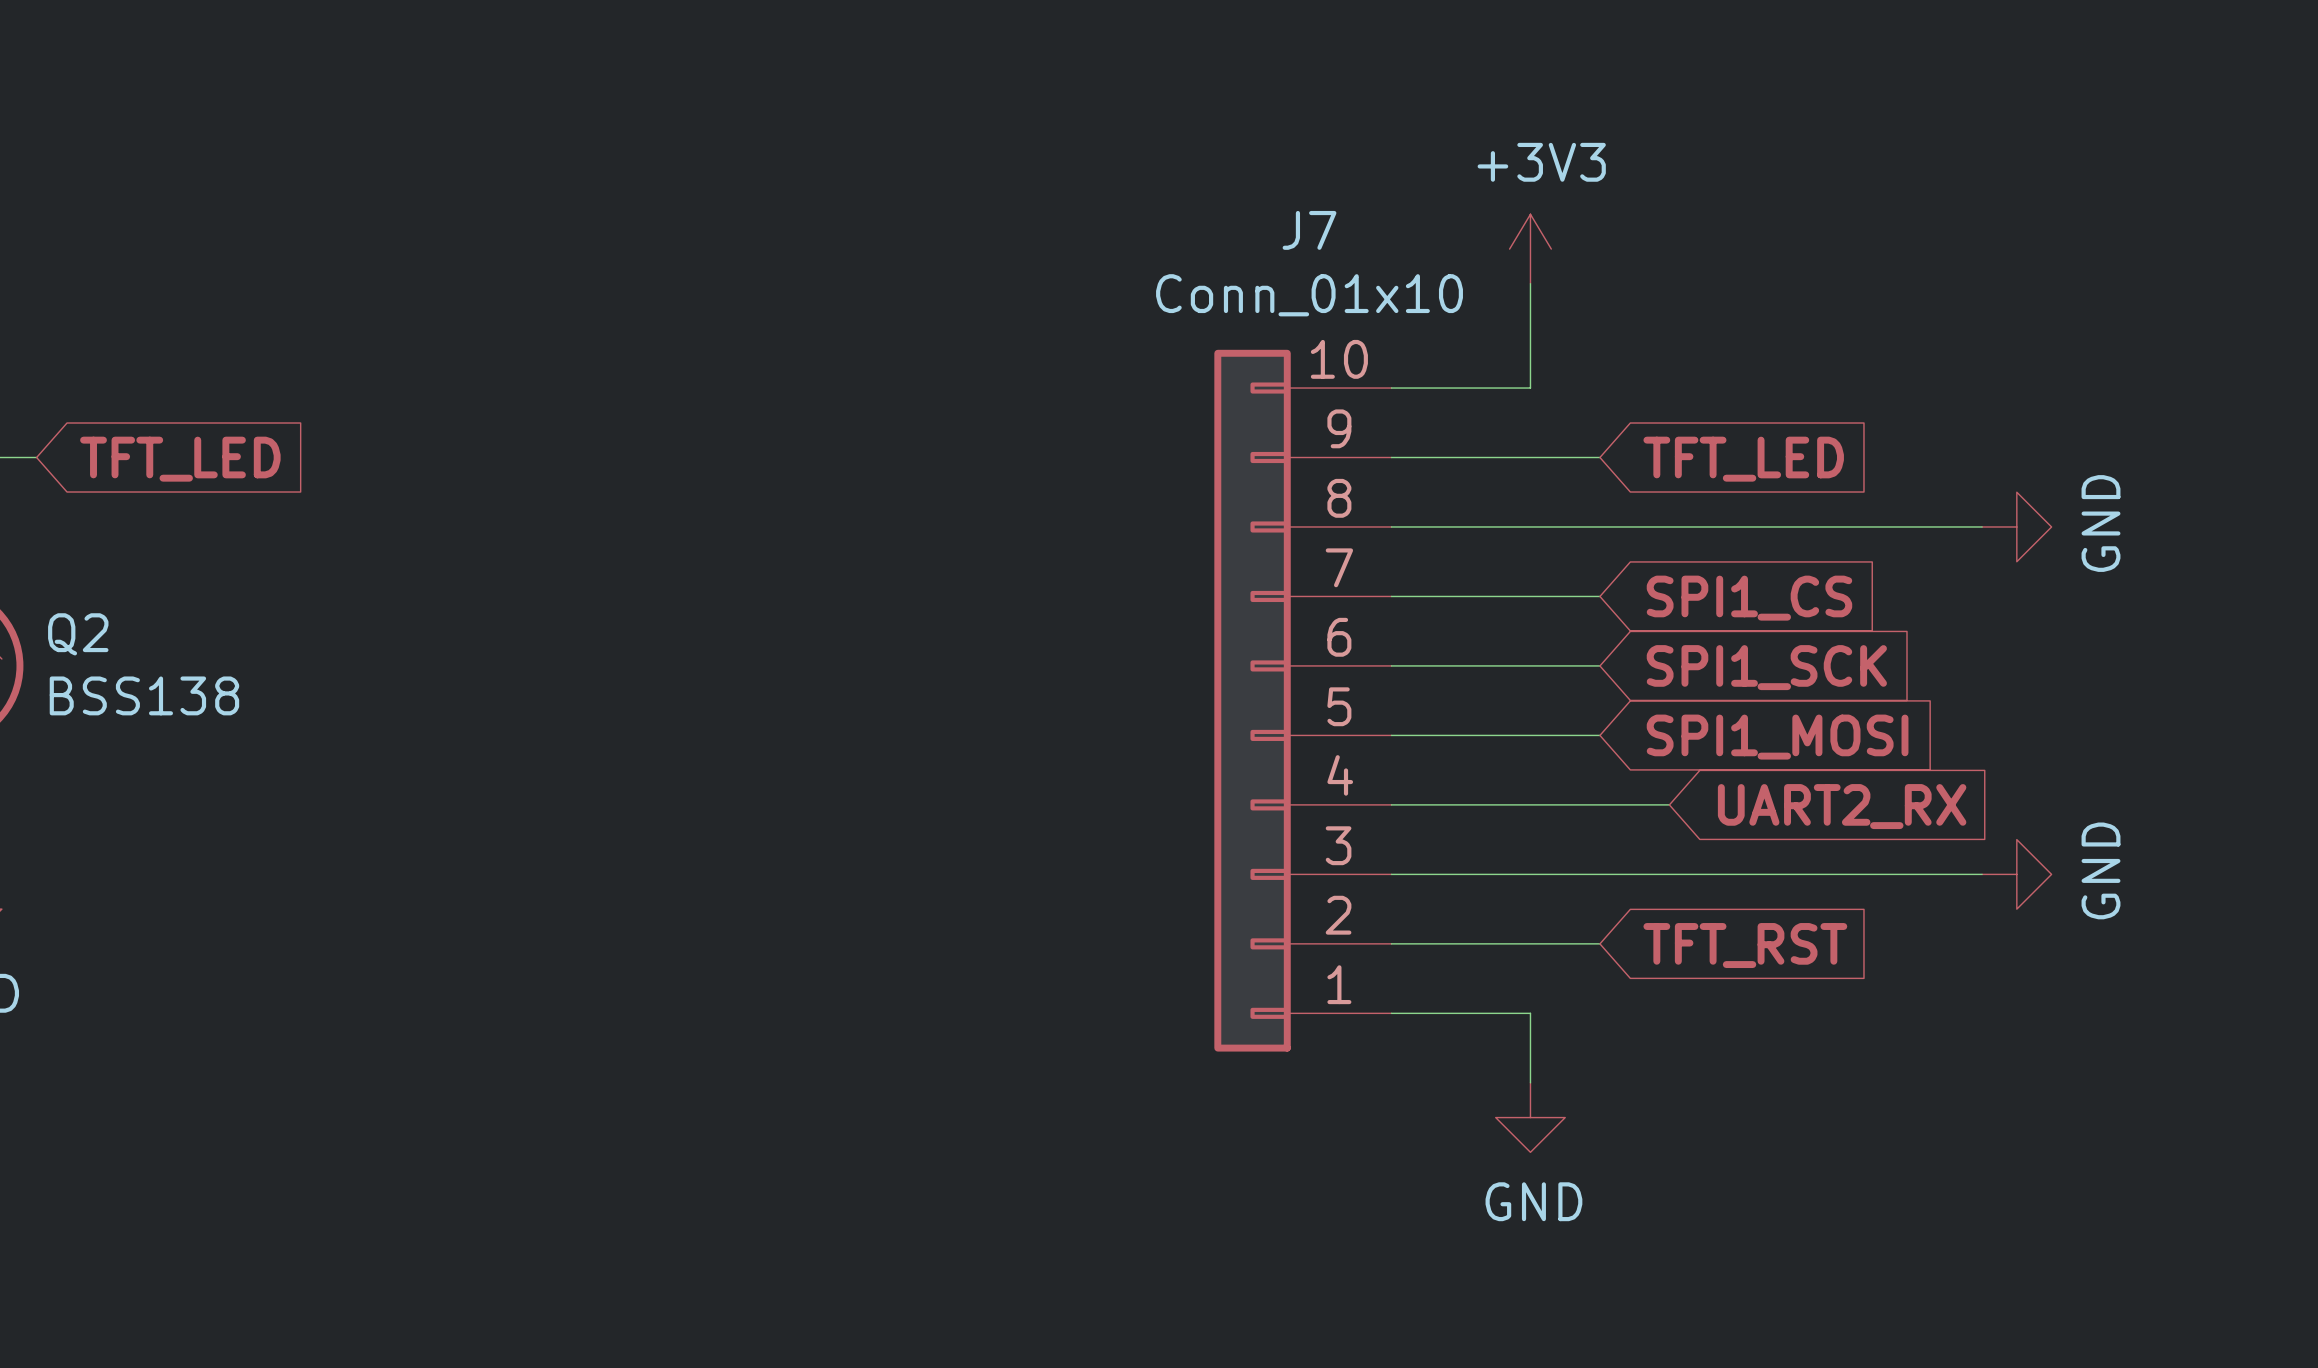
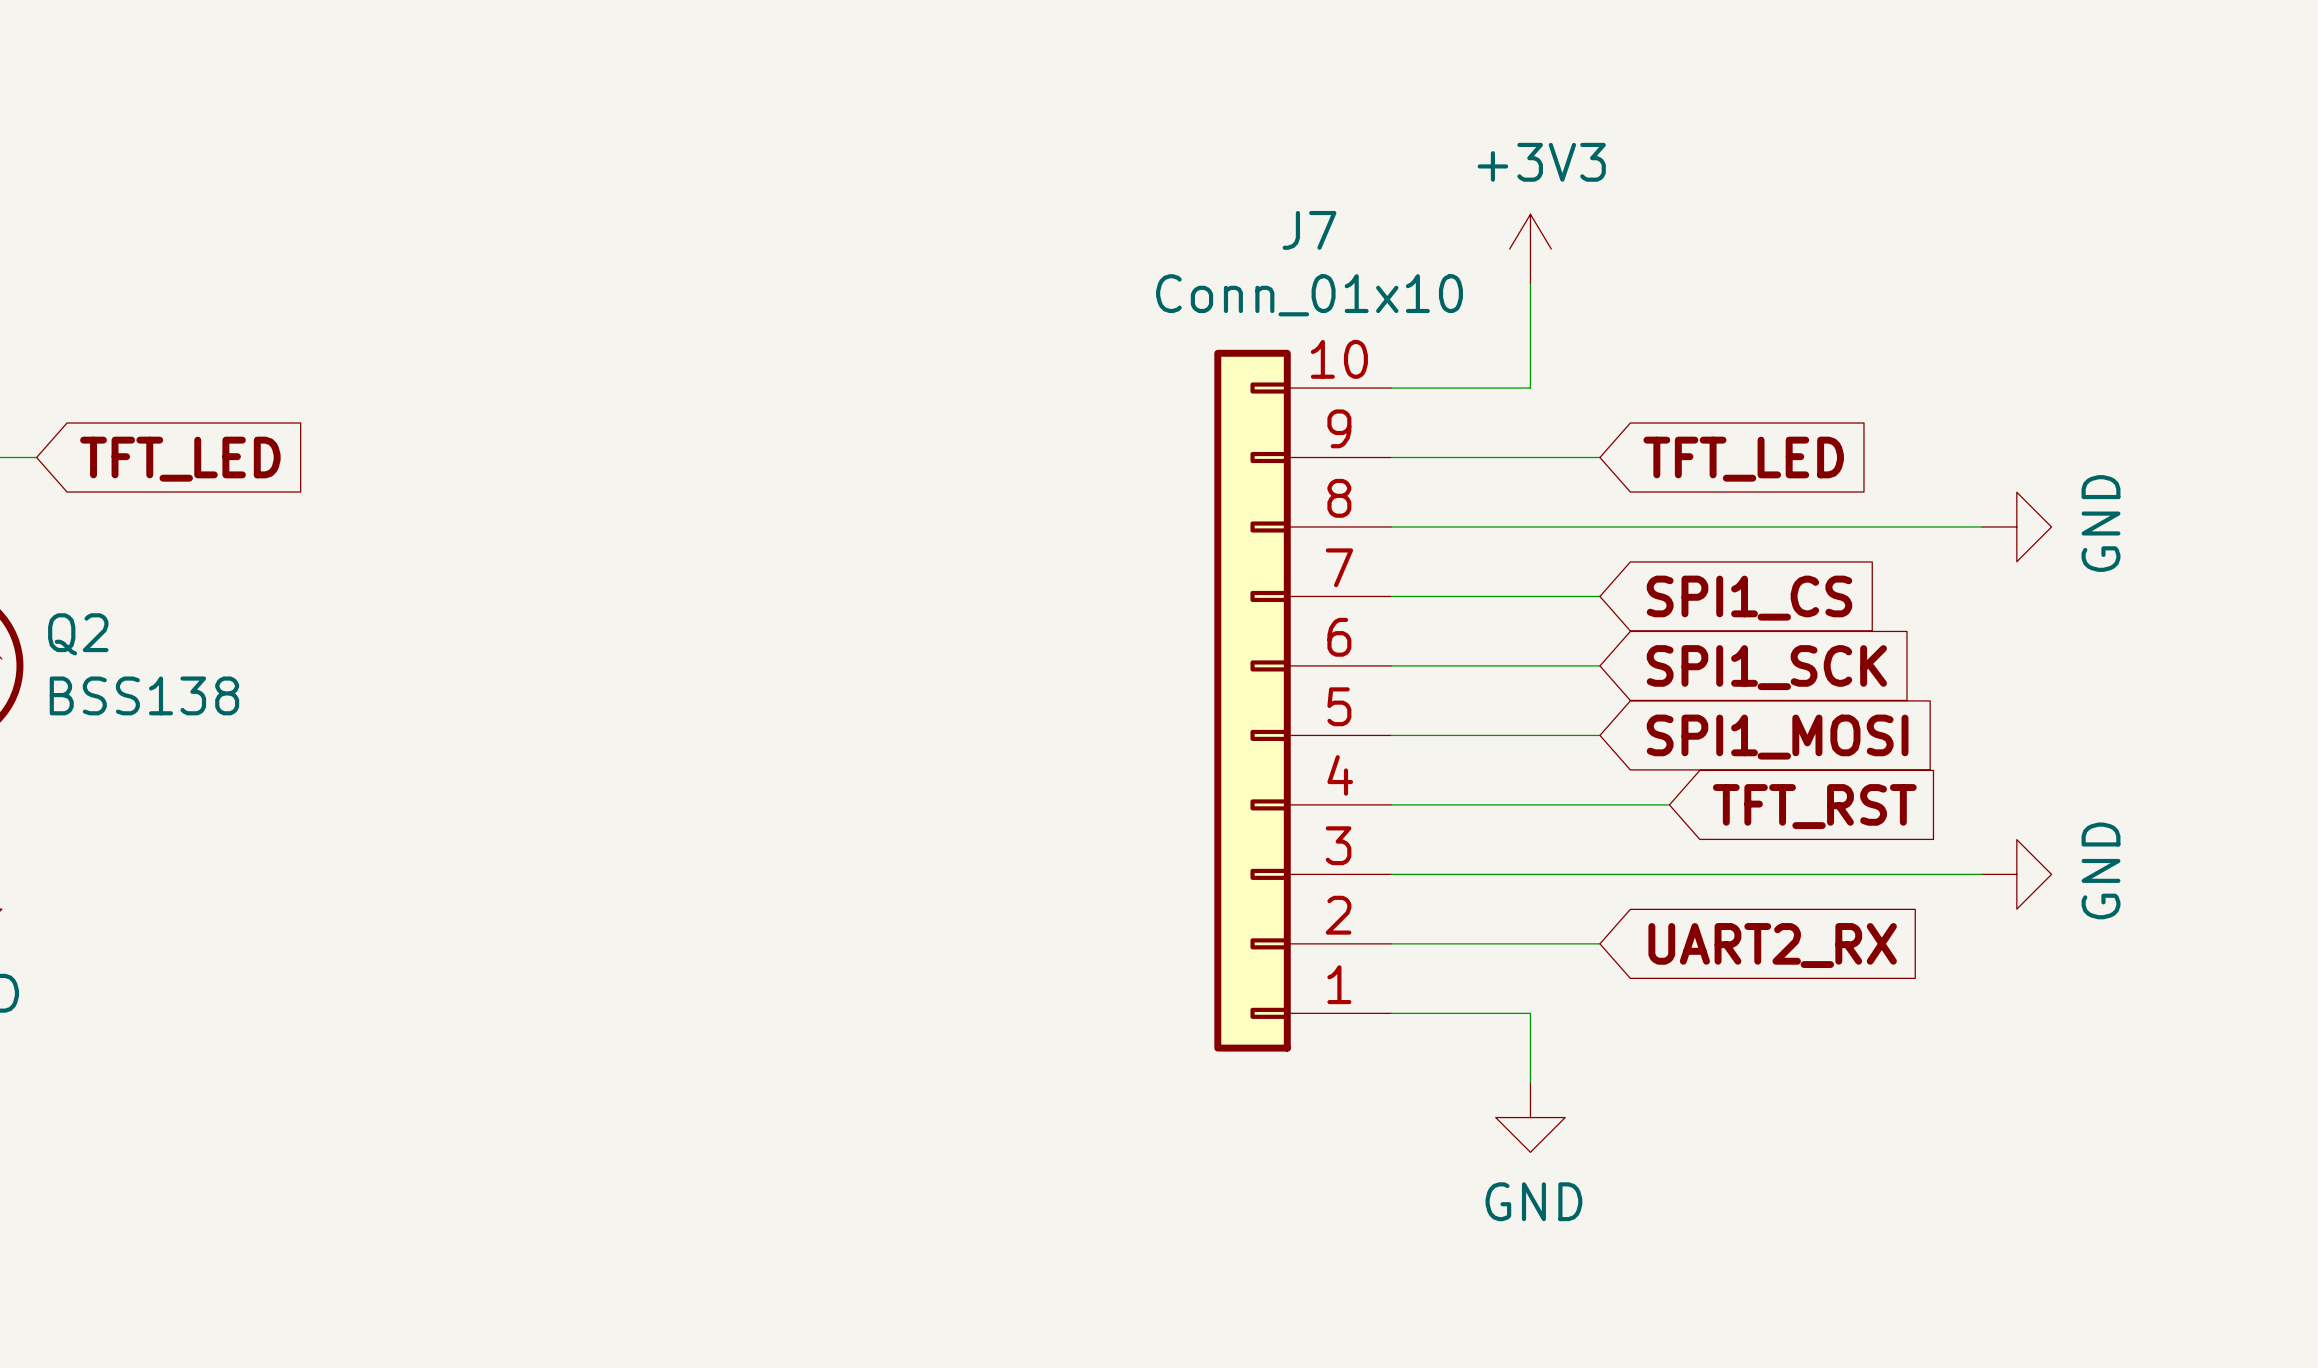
global label: UART2_RX (1842, 806) -> TFT_RST (1814, 806)
global label: TFT_RST (1745, 945) -> UART2_RX (1772, 945)

